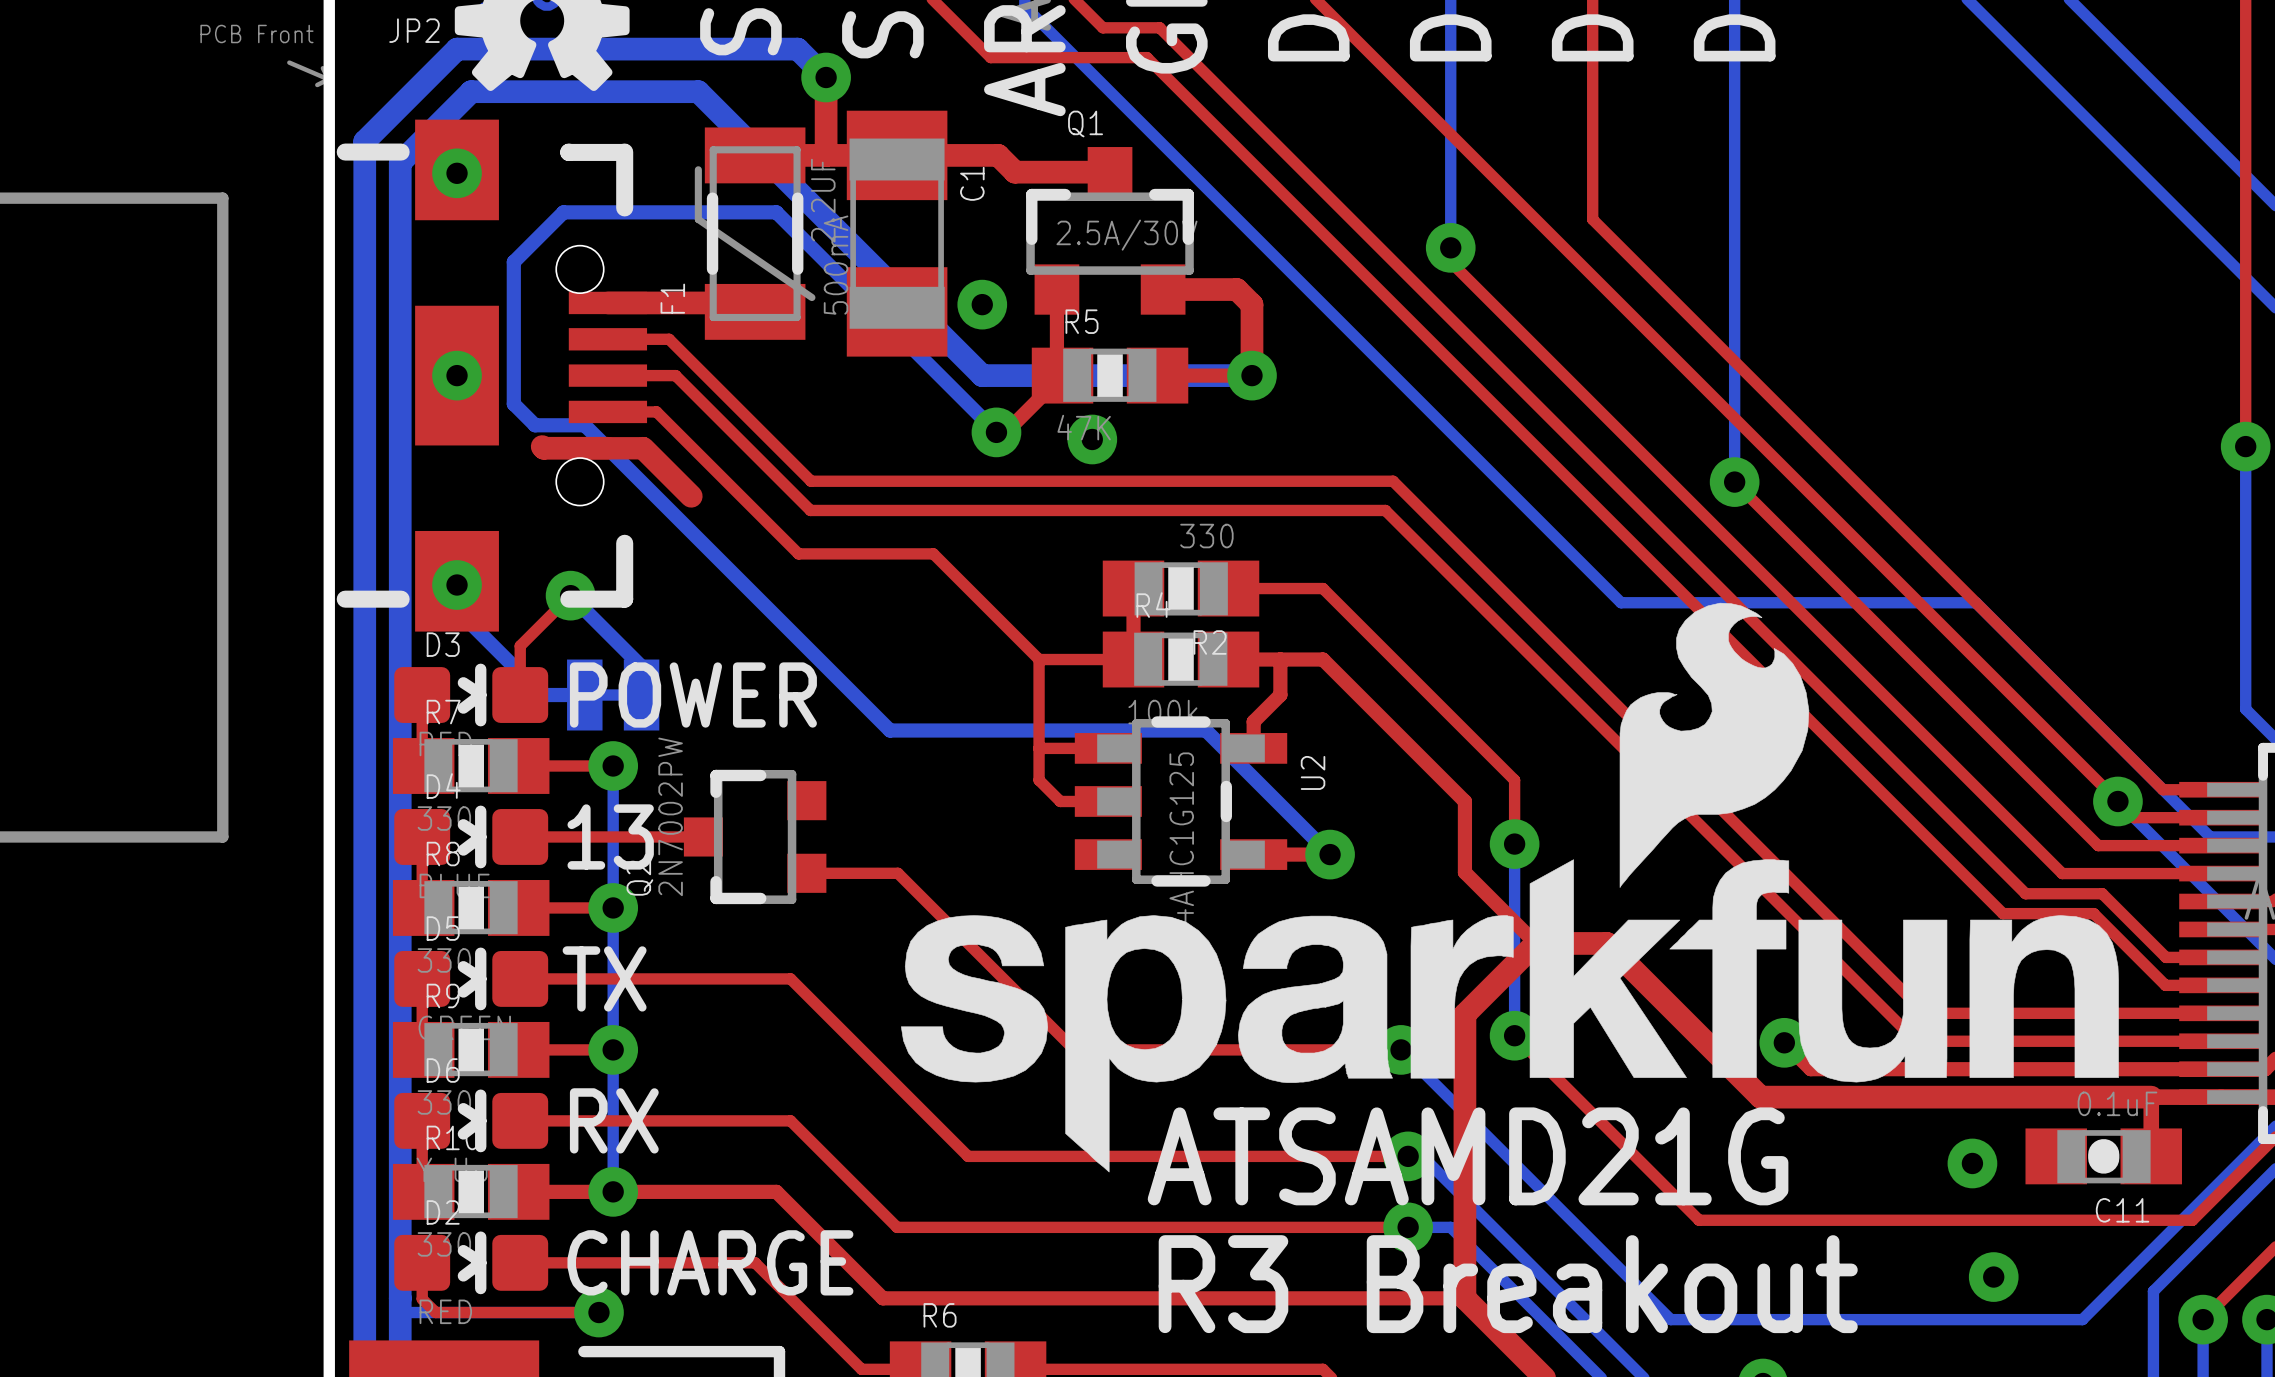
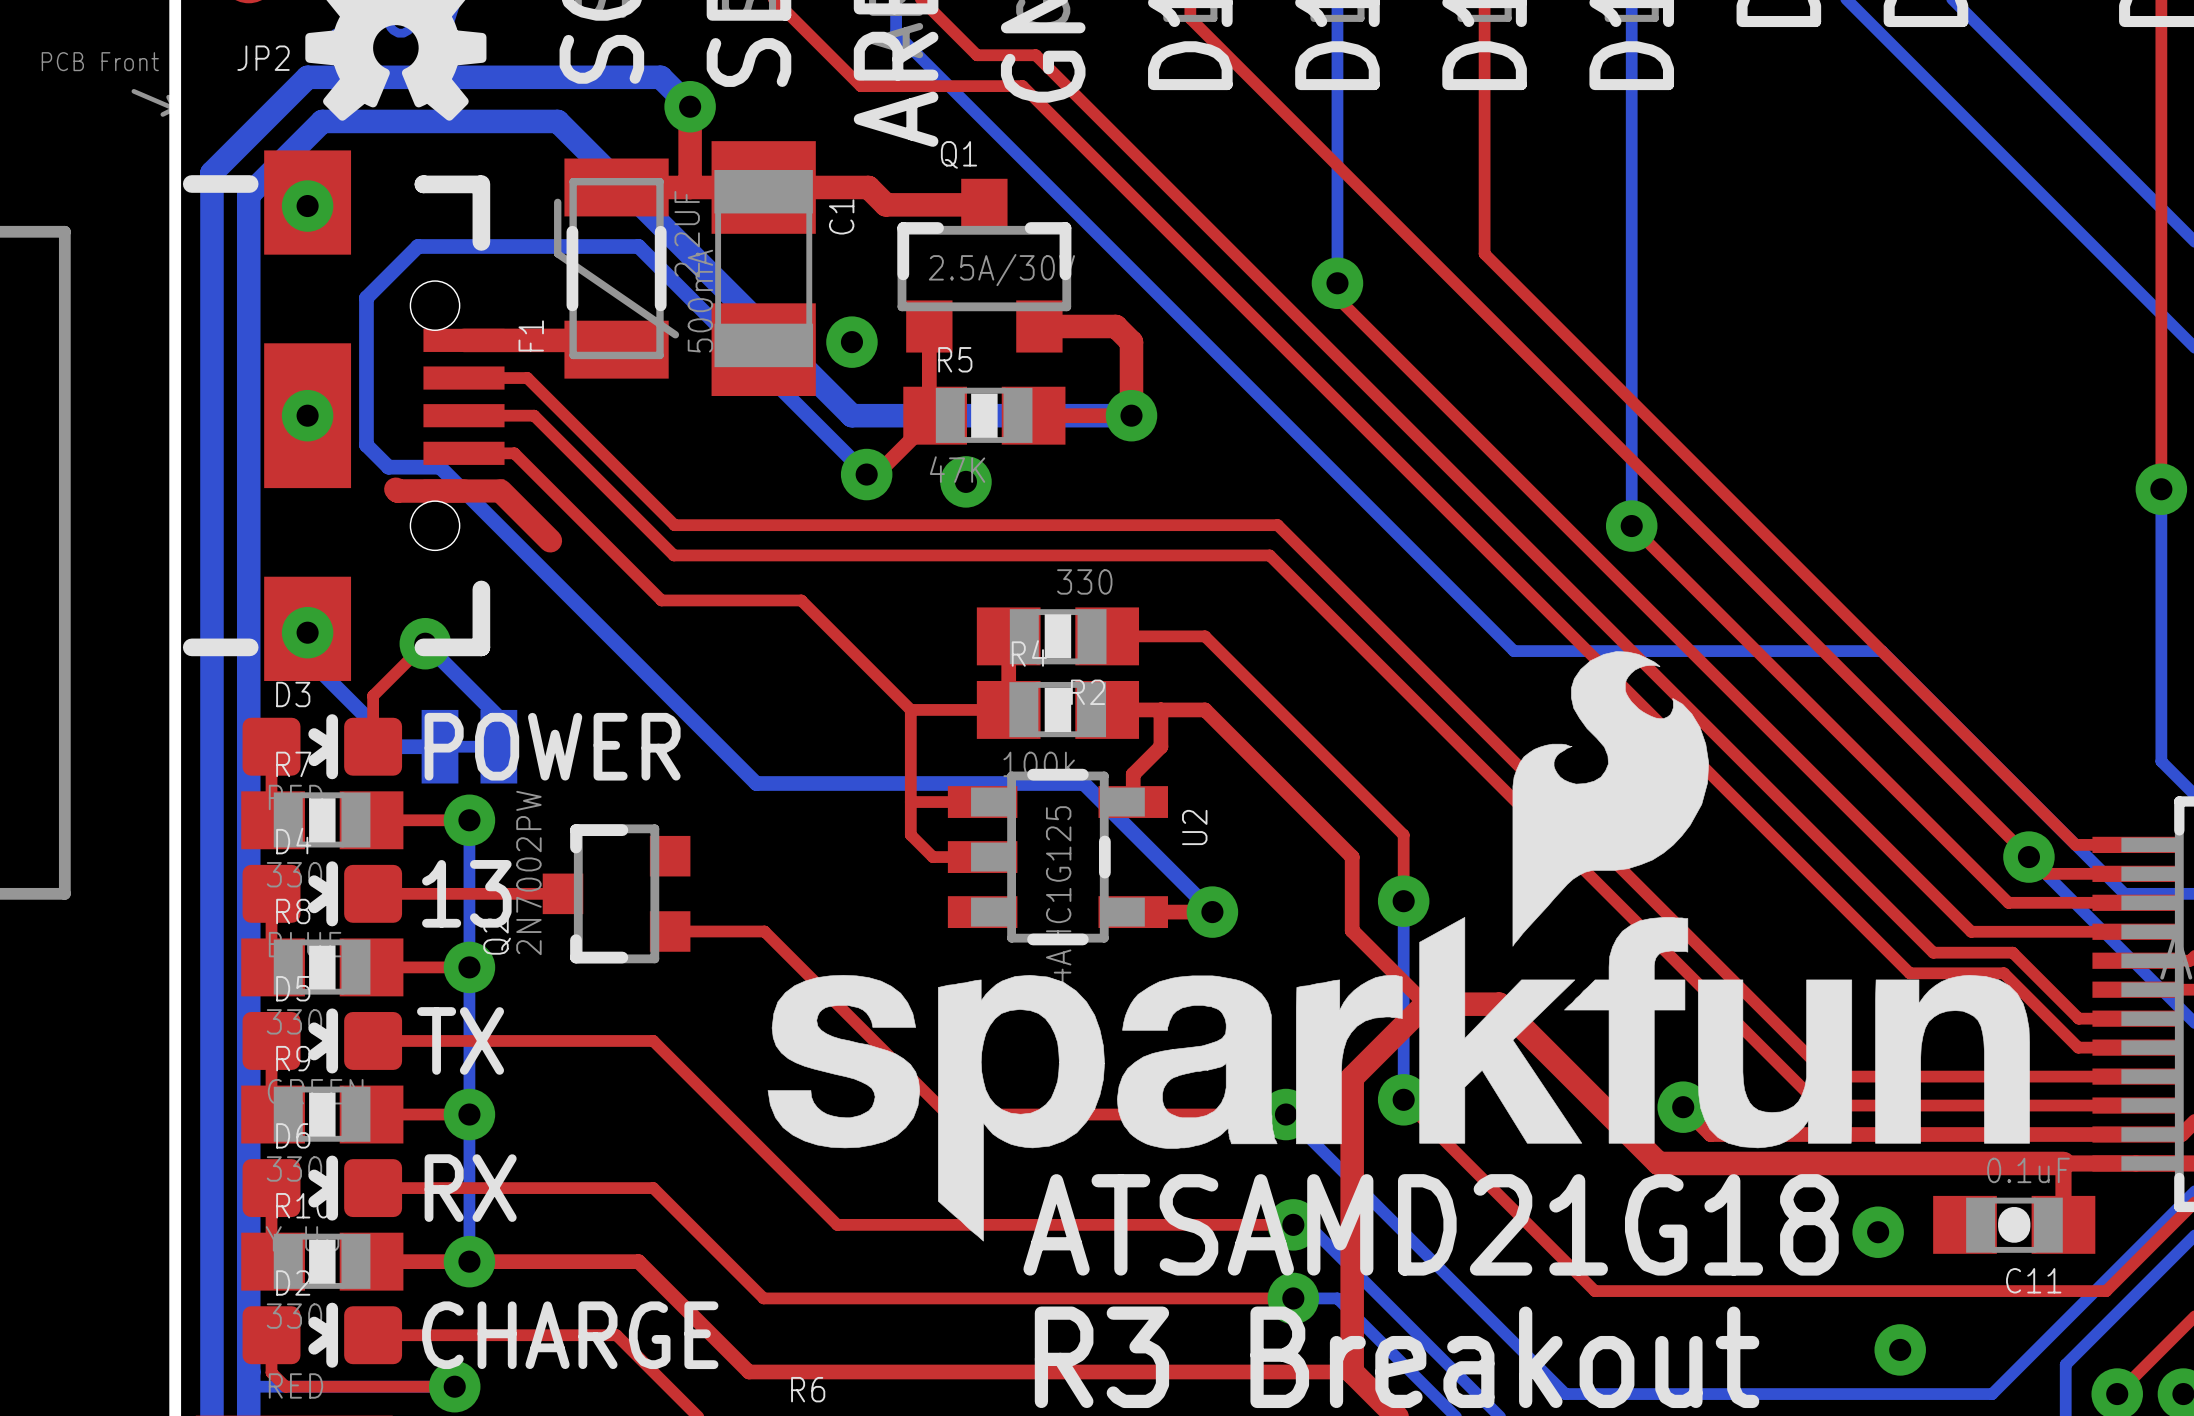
text: ATSAMD21G (1468, 1156) -> ATSAMD21G18 (1431, 1224)

